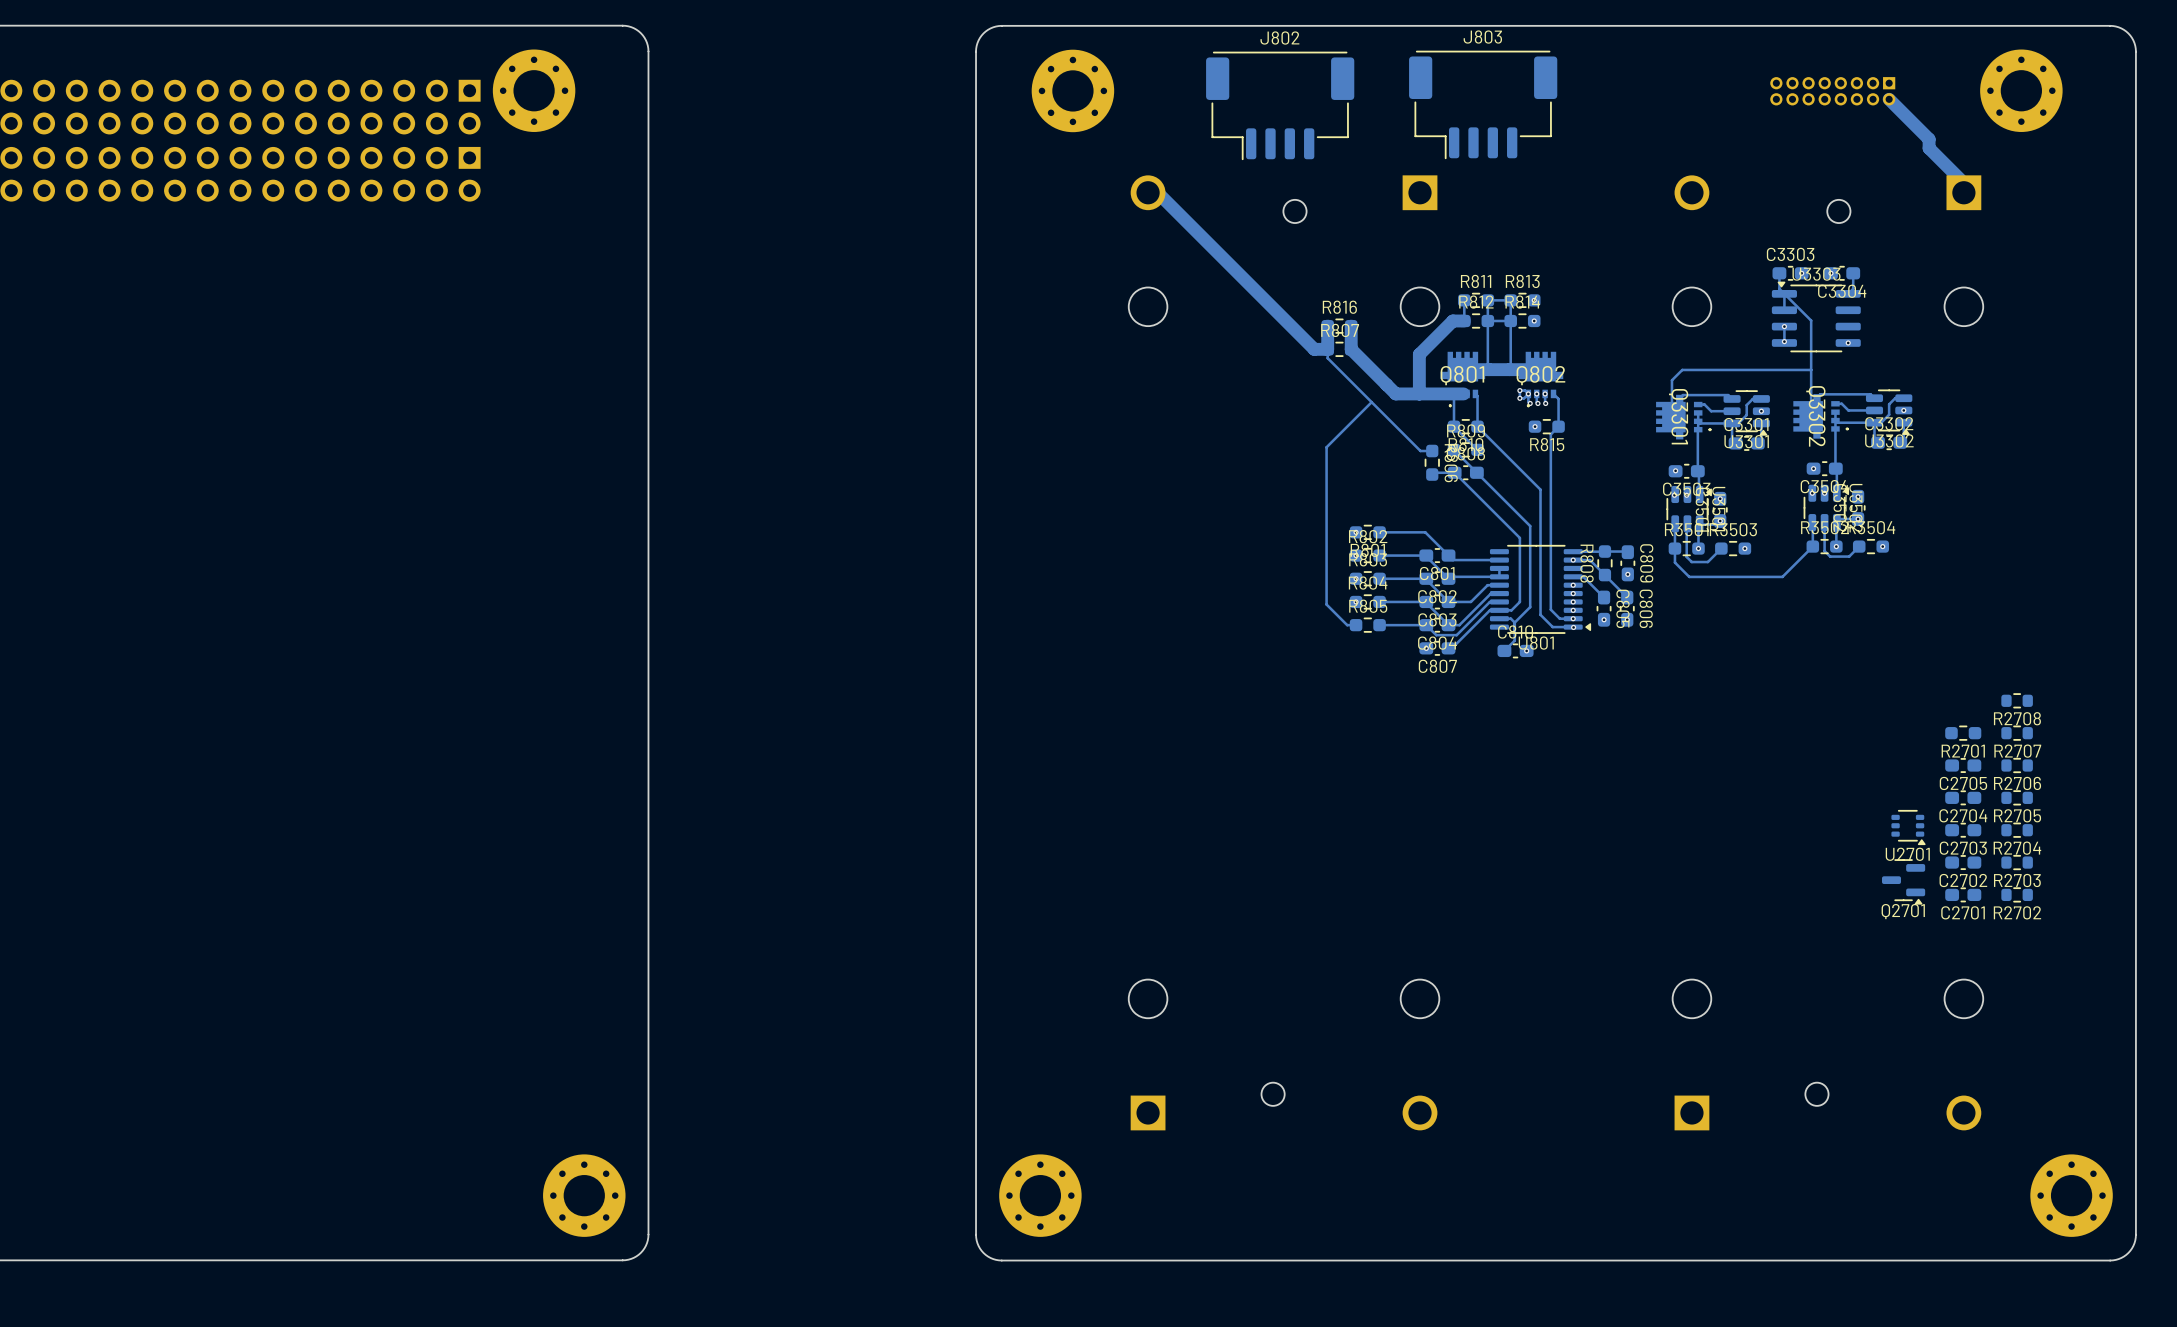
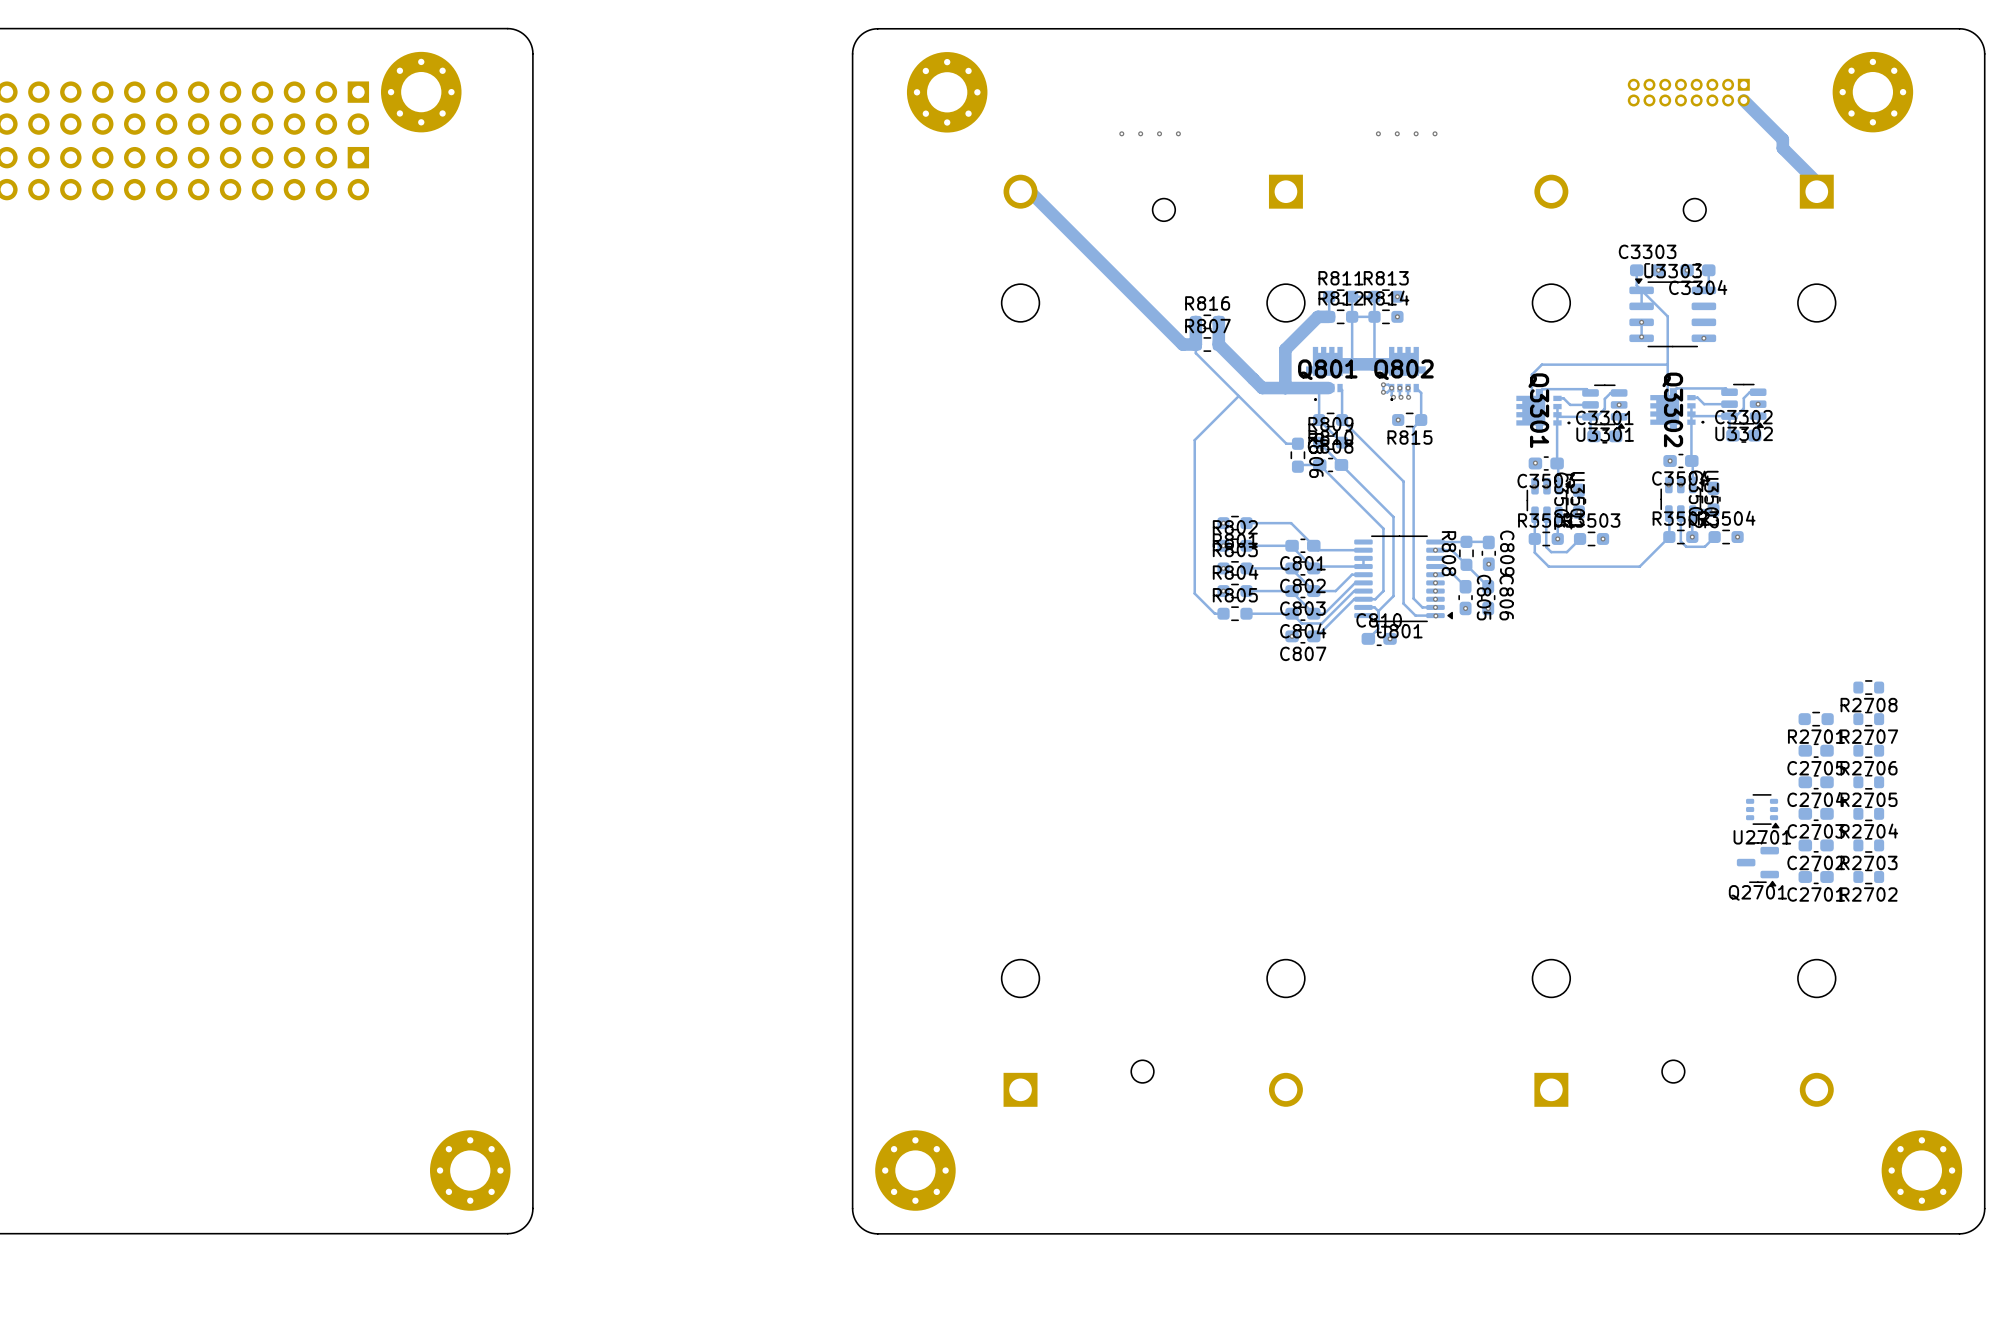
J803: (1483, 104) -> none
J802: (1280, 105) -> none
via: none -> (1121, 133)
via: none -> (1140, 133)
via: none -> (1159, 133)
via: none -> (1178, 133)
via: none -> (1378, 133)
via: none -> (1397, 133)
via: none -> (1416, 133)
via: none -> (1435, 133)

